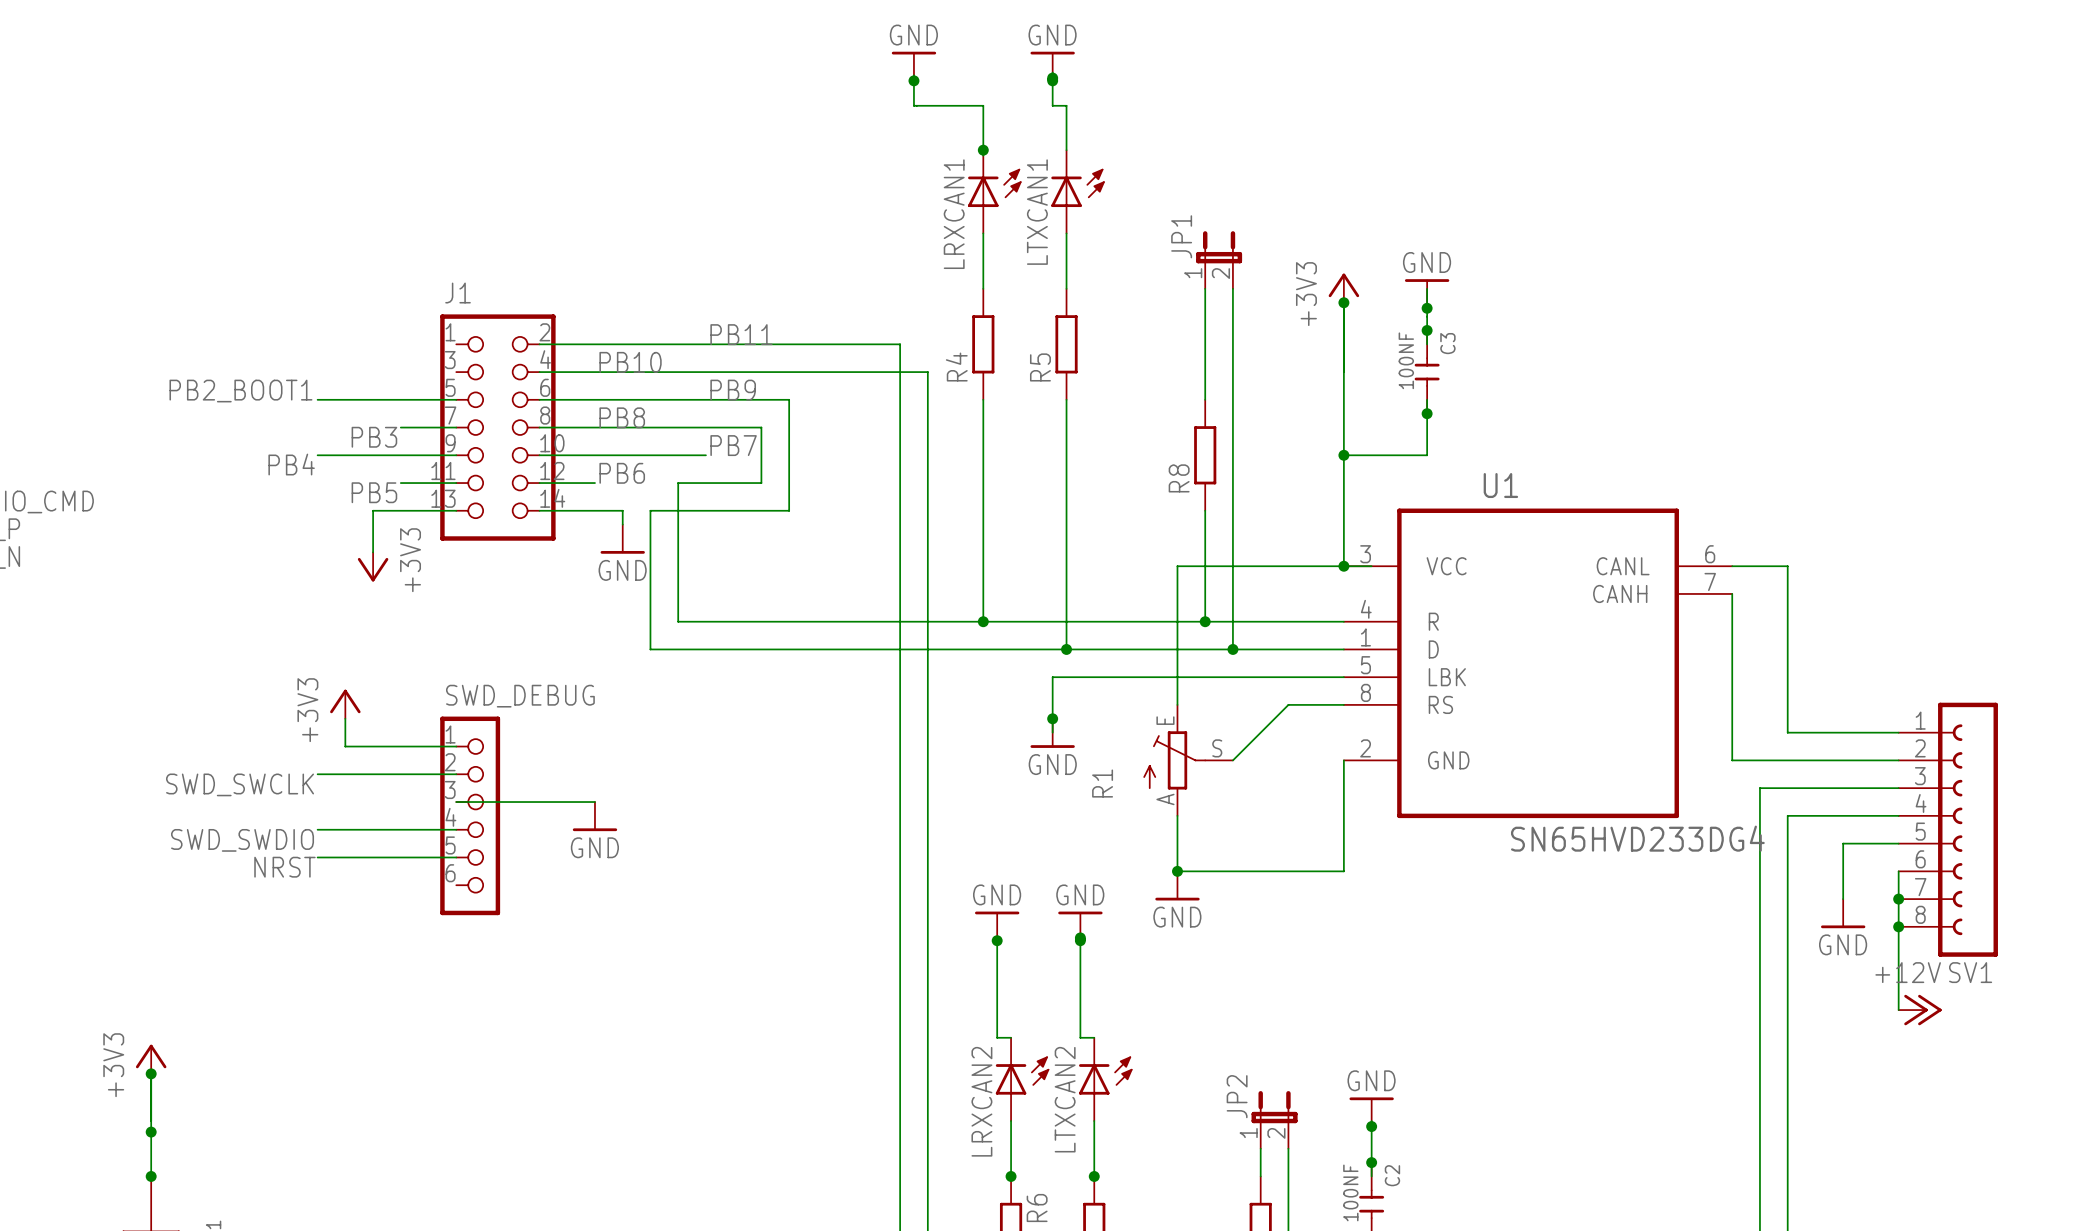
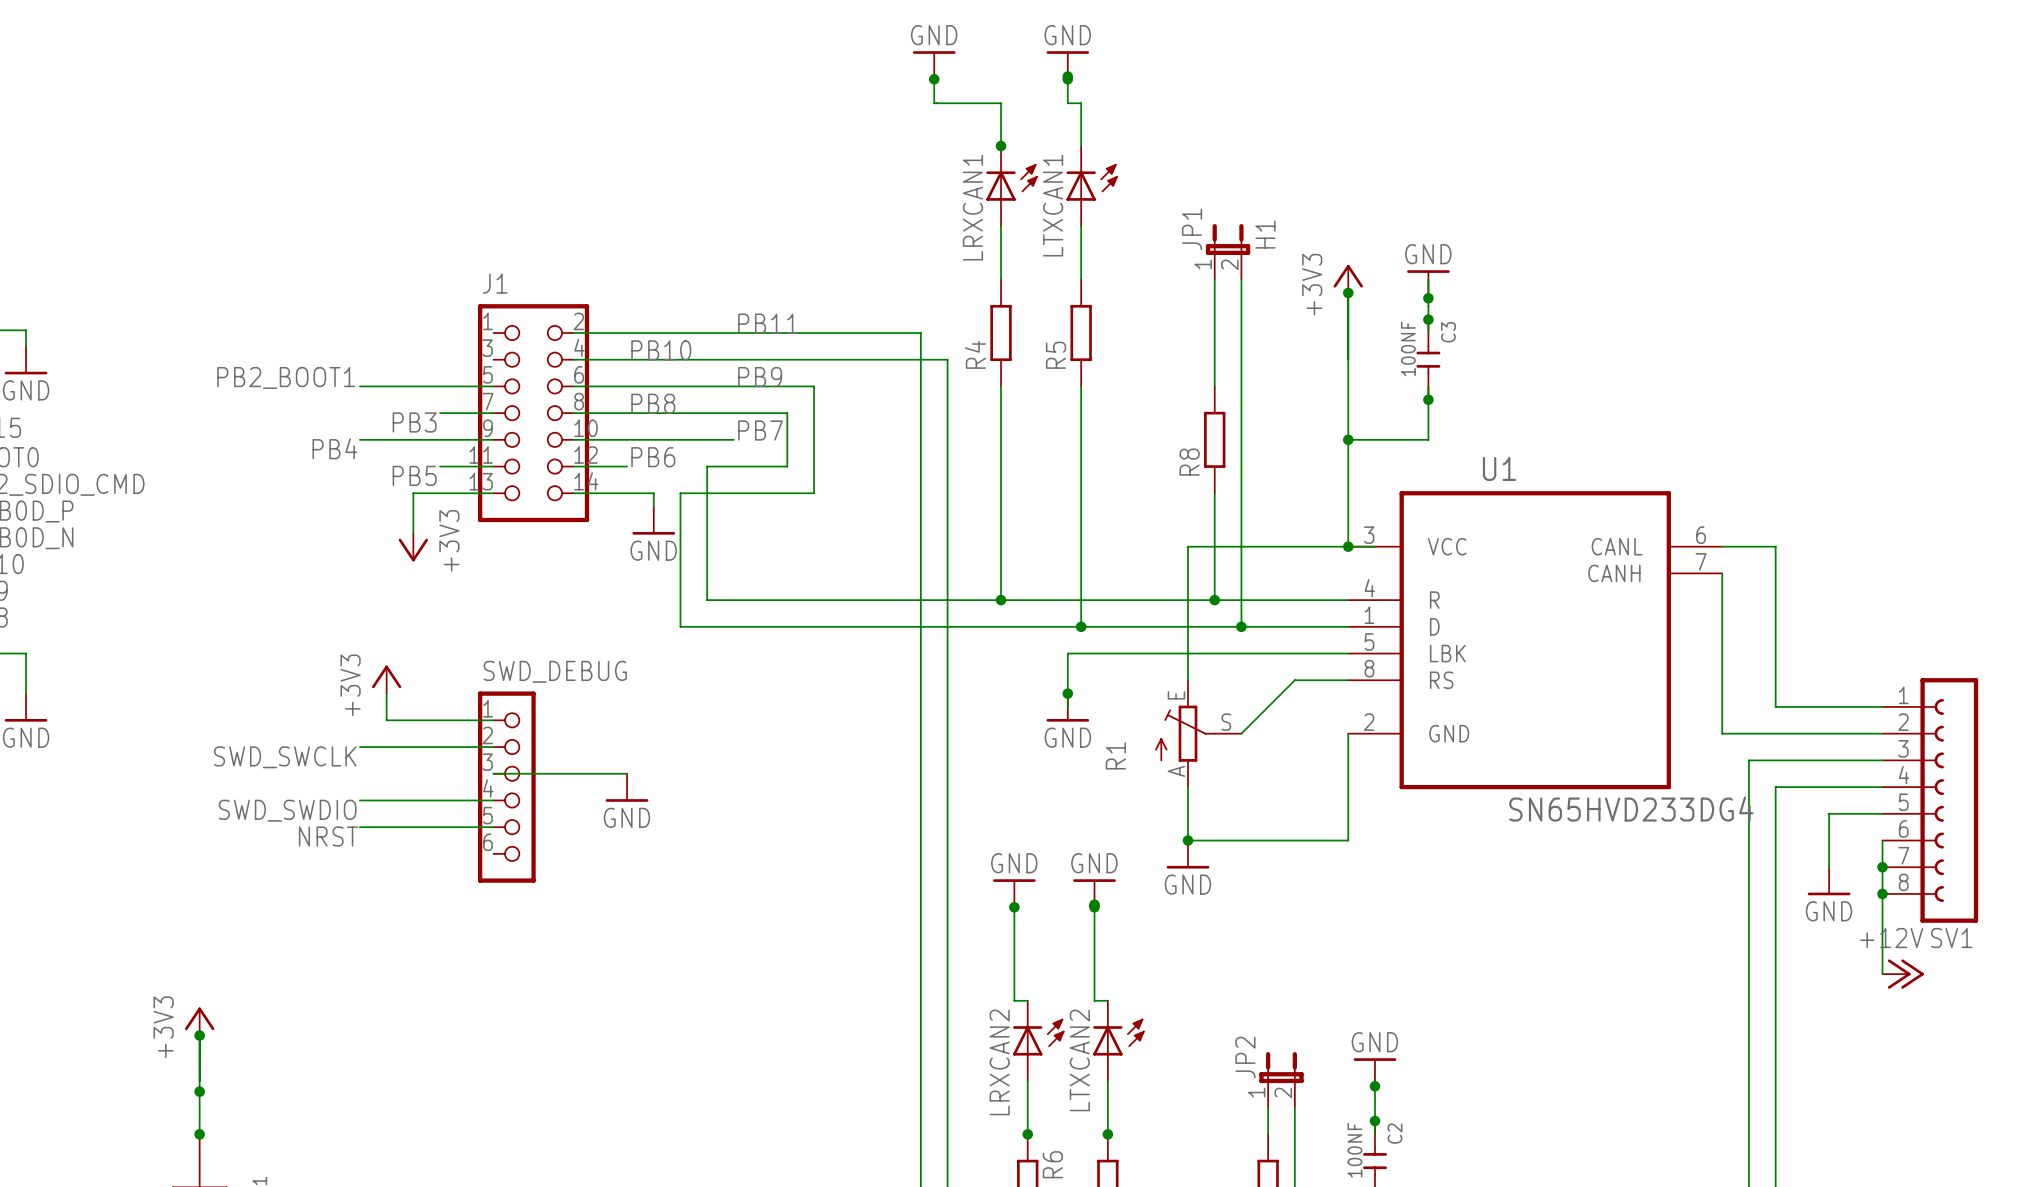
JP1 value: none -> H1 (1265, 234)

